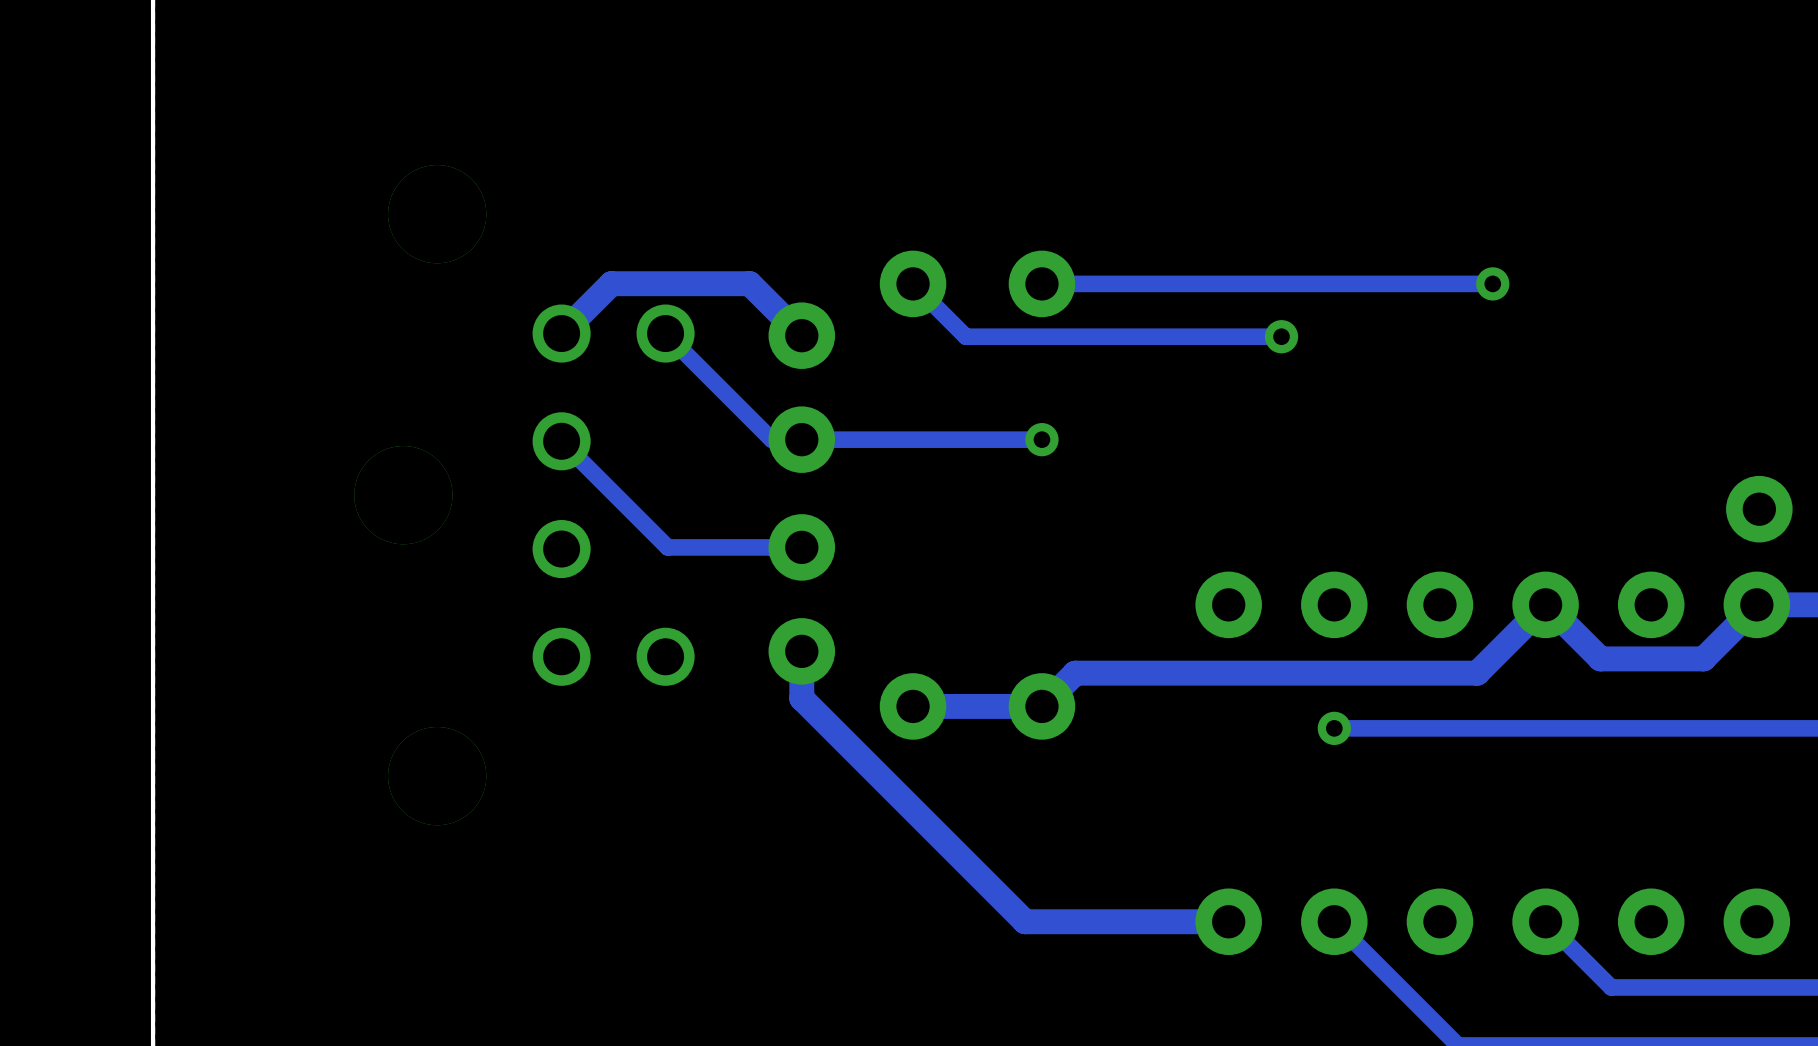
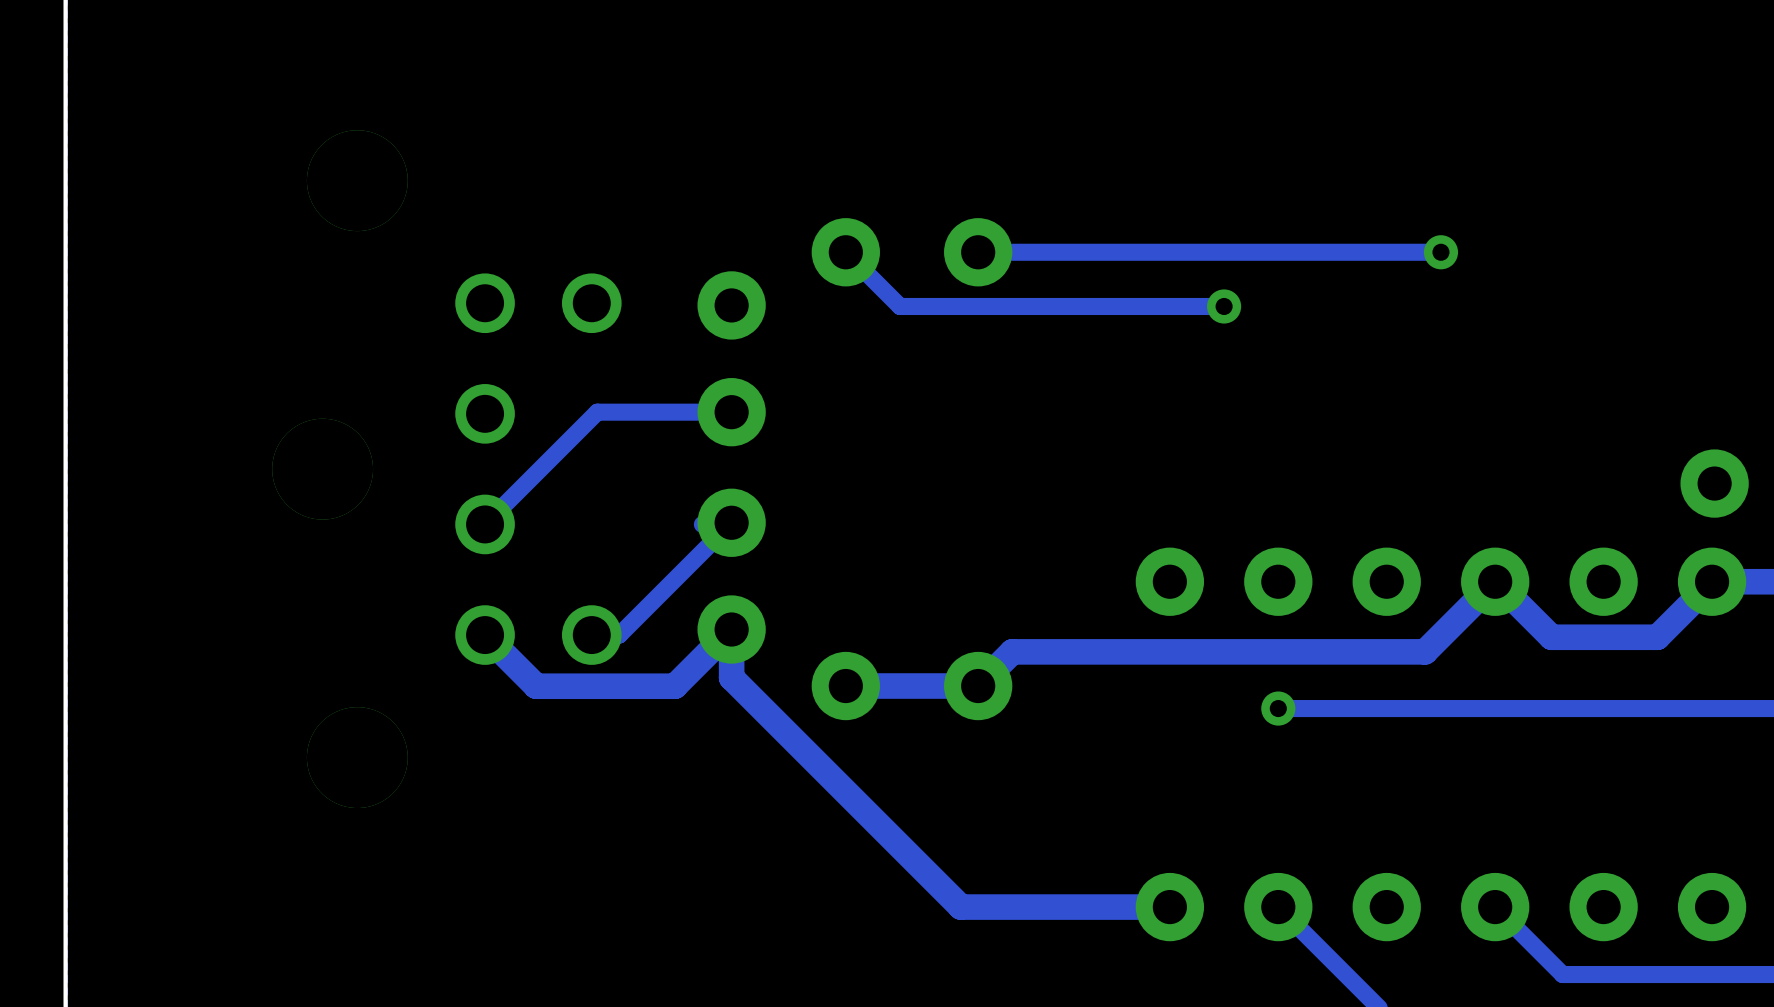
track: (561, 333) (611, 283) (749, 283) (801, 335) -> none
track: (665, 333) (771, 439) -> (485, 524) (597, 412) (700, 412)
track: (1041, 439) (801, 439) (800, 441) -> none
via: (1041, 439) -> none
track: (561, 441) (667, 547) (801, 547) -> (591, 635) (619, 635) (731, 522)
track: none -> (731, 629) (674, 686) (536, 686) (485, 635)

